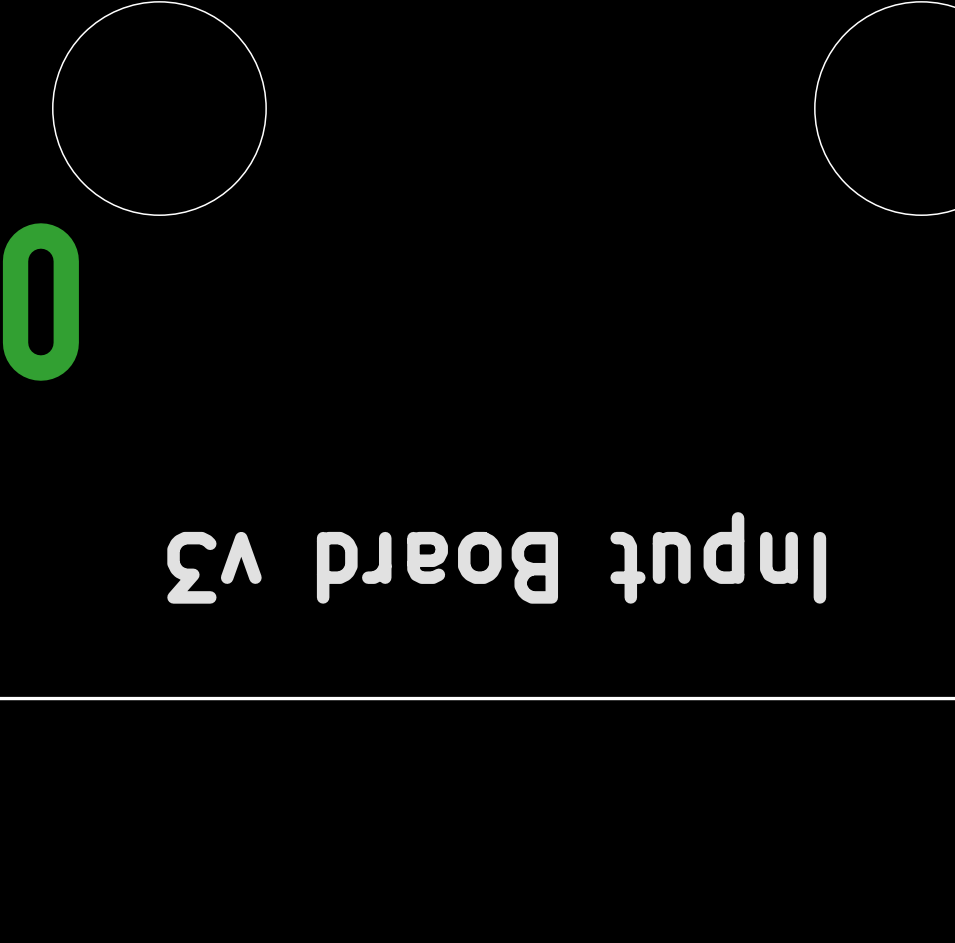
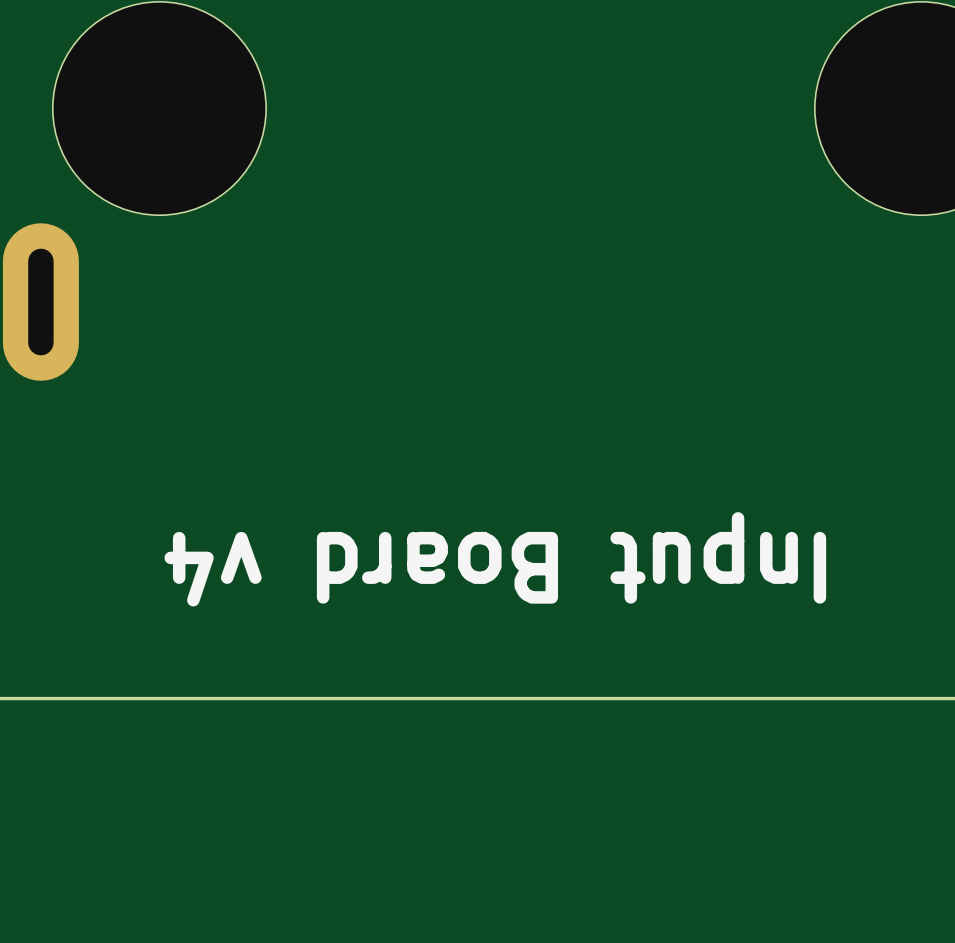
text: Input Board v3 (496, 557) -> Input Board v4 (495, 559)

